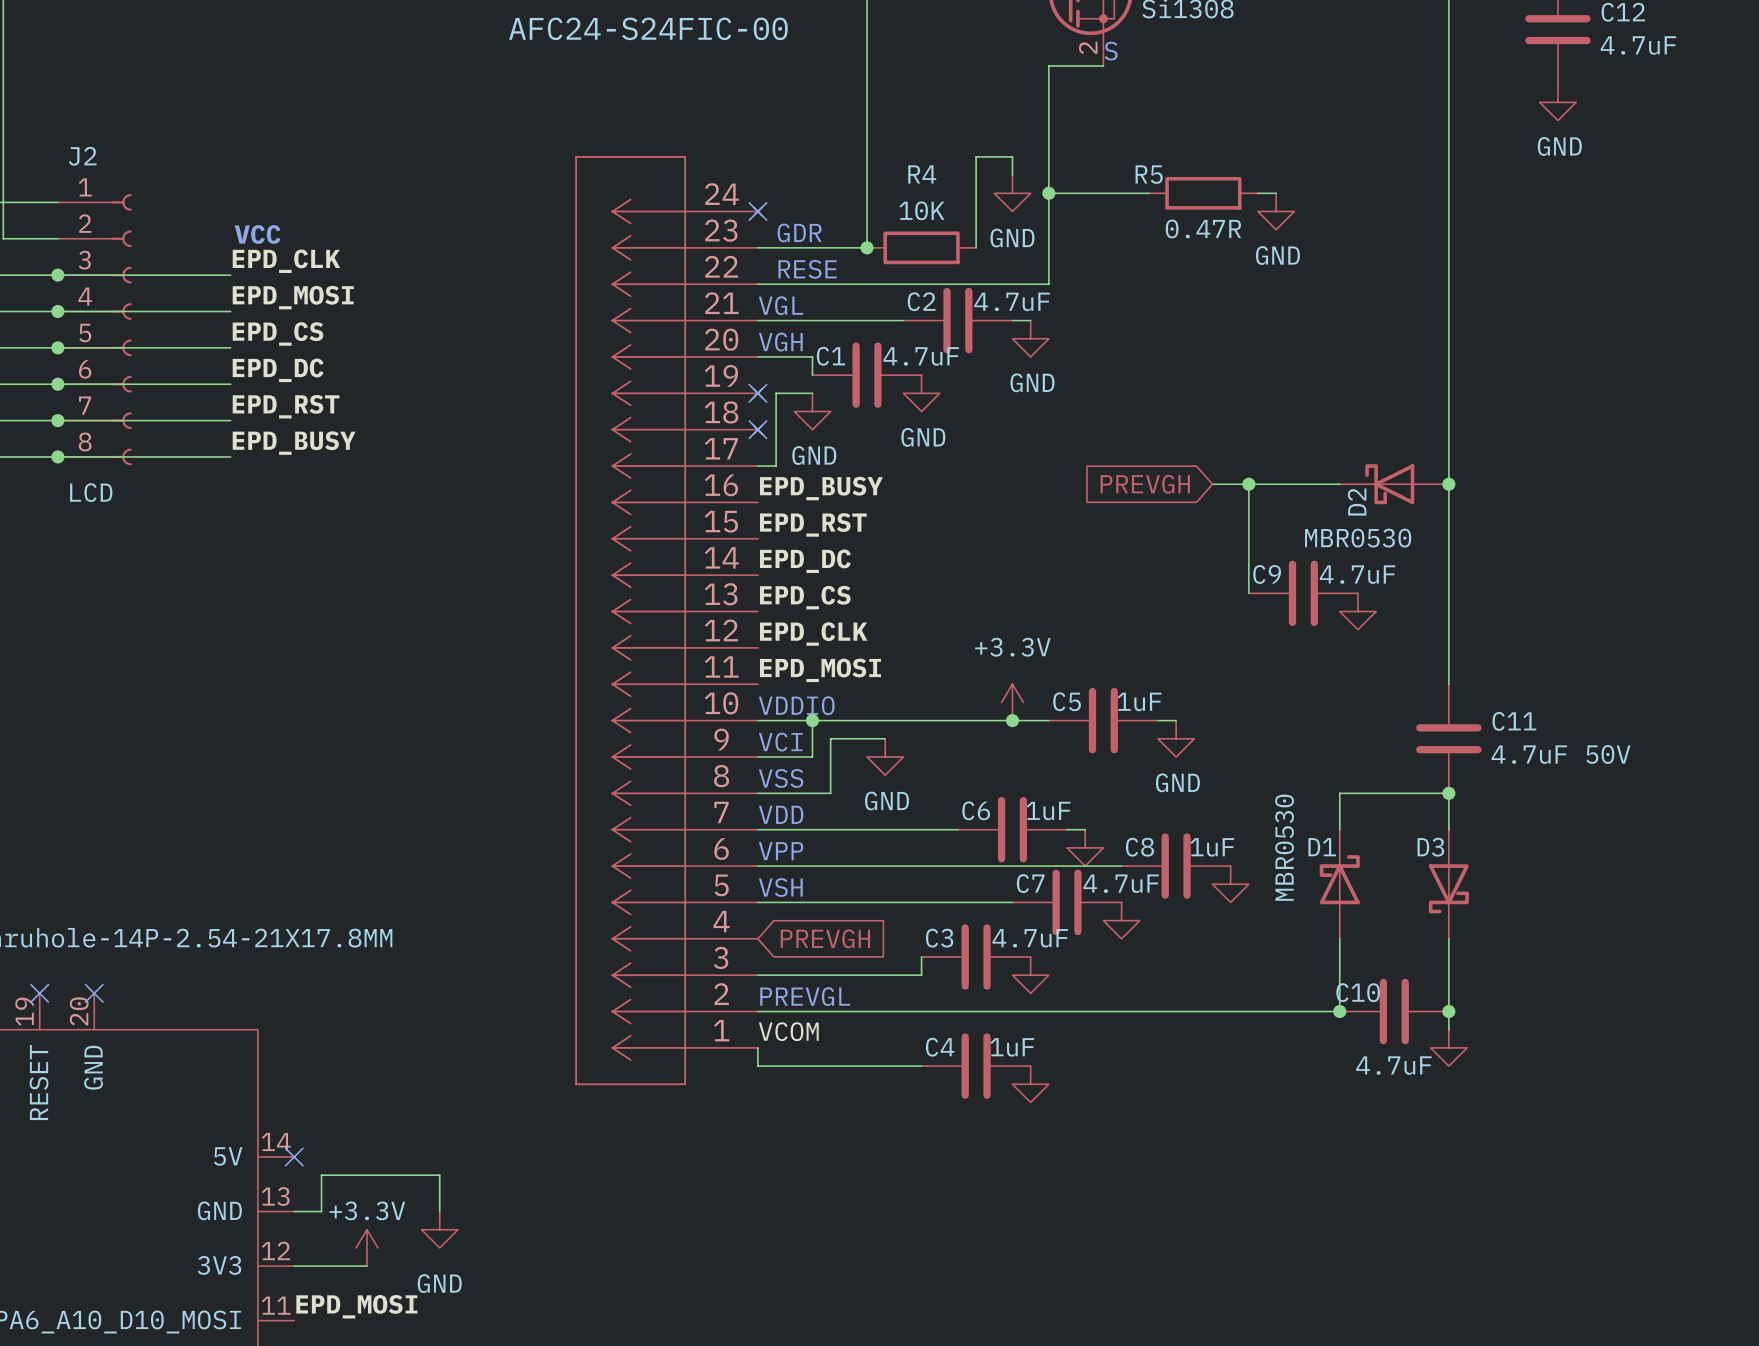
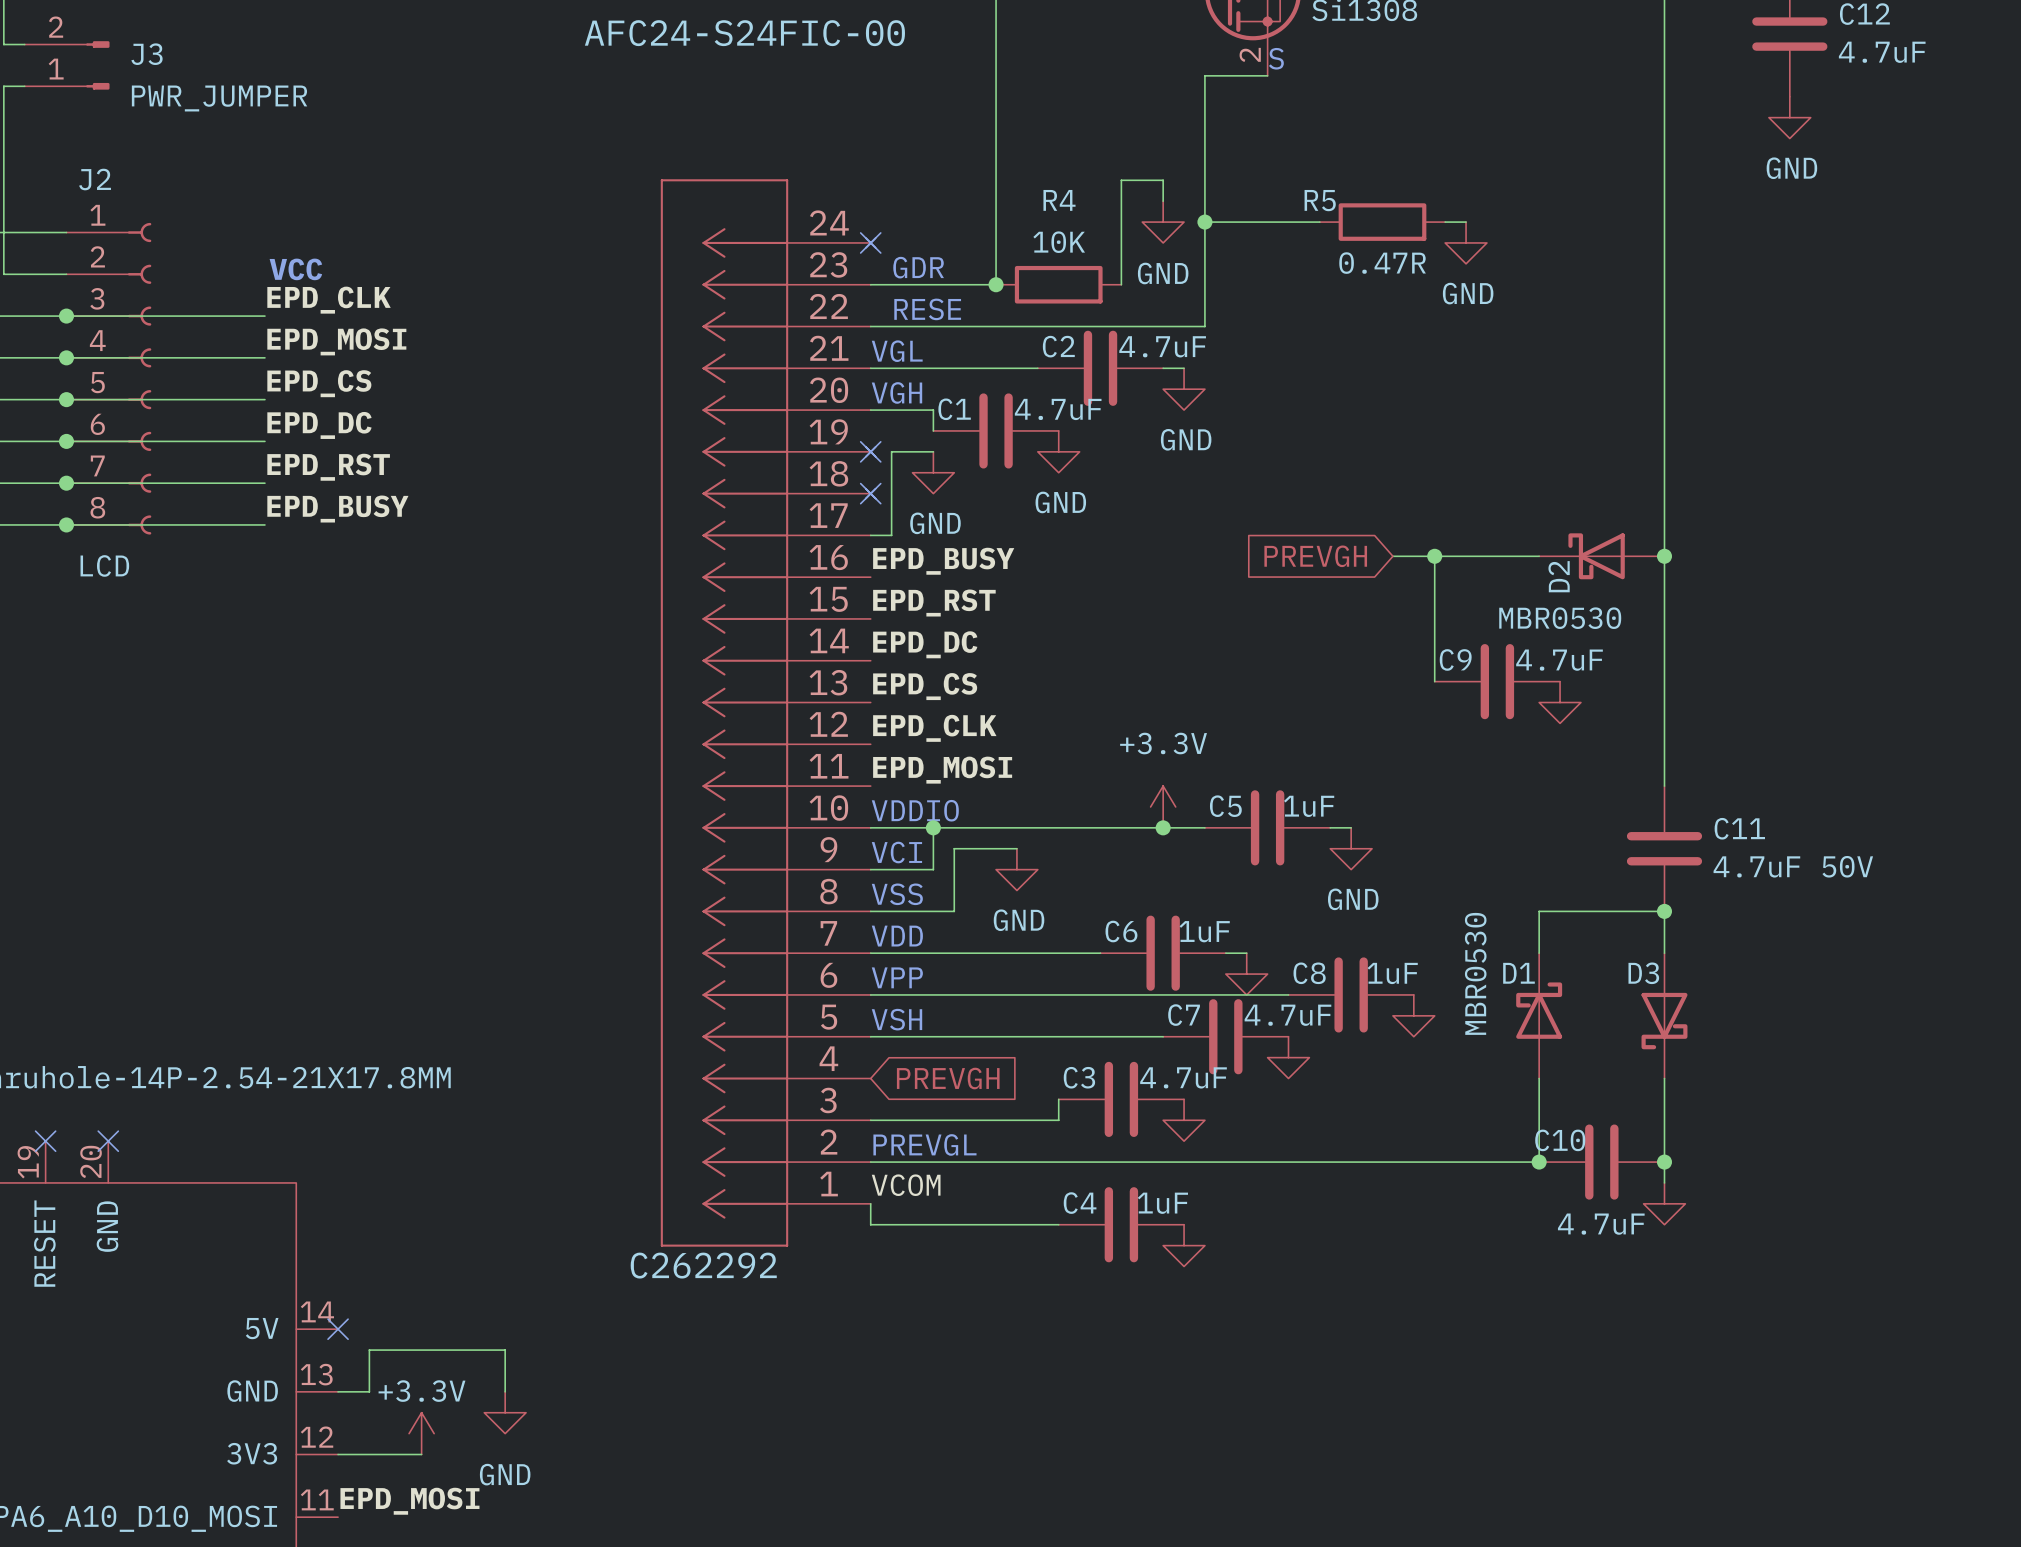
wire: (3, 38) (3, 75) -> (3, 44) (24, 44)
J3: none -> PWR_JUMPER (67, 65)
wire: none -> (3, 86) (24, 86)
part text: none -> C262292 (703, 1265)

